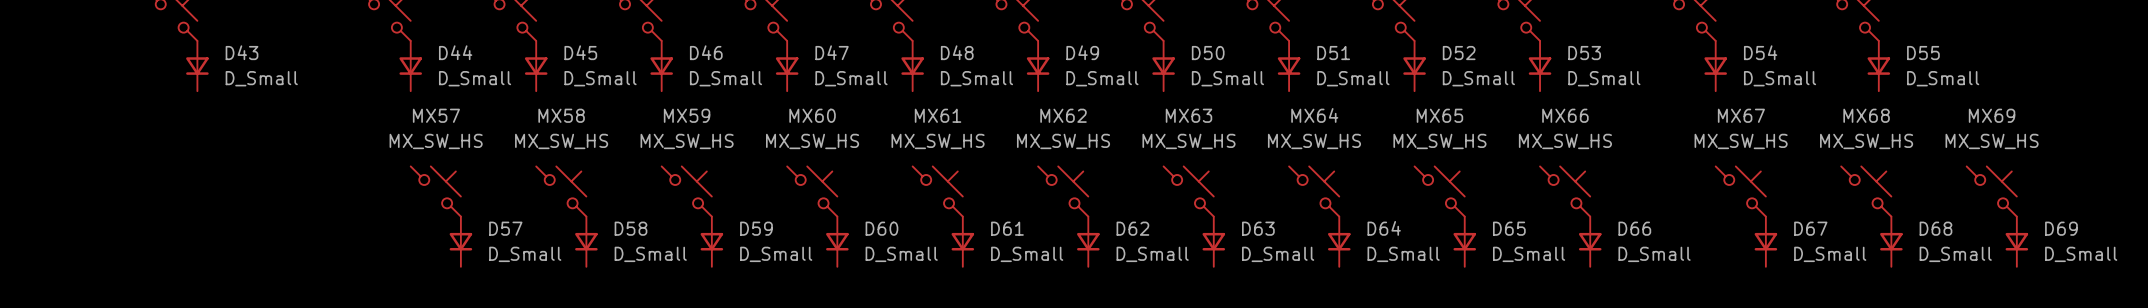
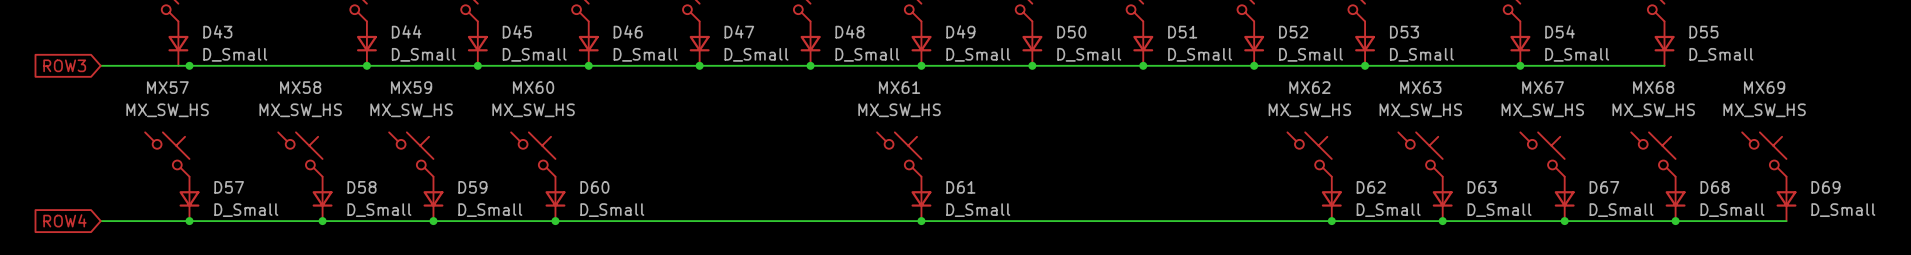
global label: none -> ROW3 (64, 65)
wire: none -> (100, 65) (1664, 65)
junction: none -> (189, 65)
junction: none -> (366, 65)
junction: none -> (477, 65)
junction: none -> (588, 65)
junction: none -> (699, 65)
junction: none -> (810, 65)
junction: none -> (921, 65)
junction: none -> (1032, 65)
junction: none -> (1143, 65)
junction: none -> (1254, 65)
junction: none -> (1365, 65)
junction: none -> (1520, 65)
MX57 position: (435, 191) -> (167, 154)
MX58 position: (561, 191) -> (300, 154)
MX59 position: (686, 191) -> (411, 154)
MX60 position: (812, 191) -> (533, 154)
MX61 position: (937, 191) -> (899, 154)
MX62 position: (1063, 191) -> (1309, 154)
MX63 position: (1188, 191) -> (1420, 154)
MX64: MX_SW_HS (1314, 191) -> none
MX65: MX_SW_HS (1439, 191) -> none
MX66: MX_SW_HS (1565, 191) -> none
D57 position: (460, 241) -> (189, 198)
D58 position: (586, 241) -> (322, 198)
D59 position: (711, 241) -> (433, 198)
D60 position: (837, 241) -> (555, 198)
D61 position: (962, 241) -> (921, 198)
D62 position: (1088, 241) -> (1331, 198)
D63 position: (1213, 241) -> (1442, 198)
D64: D_Small (1339, 241) -> none
D65: D_Small (1464, 241) -> none
D66: D_Small (1590, 241) -> none
global label: none -> ROW4 (64, 220)
wire: none -> (100, 221) (1786, 221)
junction: none -> (189, 221)
junction: none -> (322, 221)
junction: none -> (433, 221)
junction: none -> (555, 221)
junction: none -> (921, 221)
junction: none -> (1331, 221)
junction: none -> (1442, 221)
junction: none -> (1564, 221)
junction: none -> (1675, 221)

